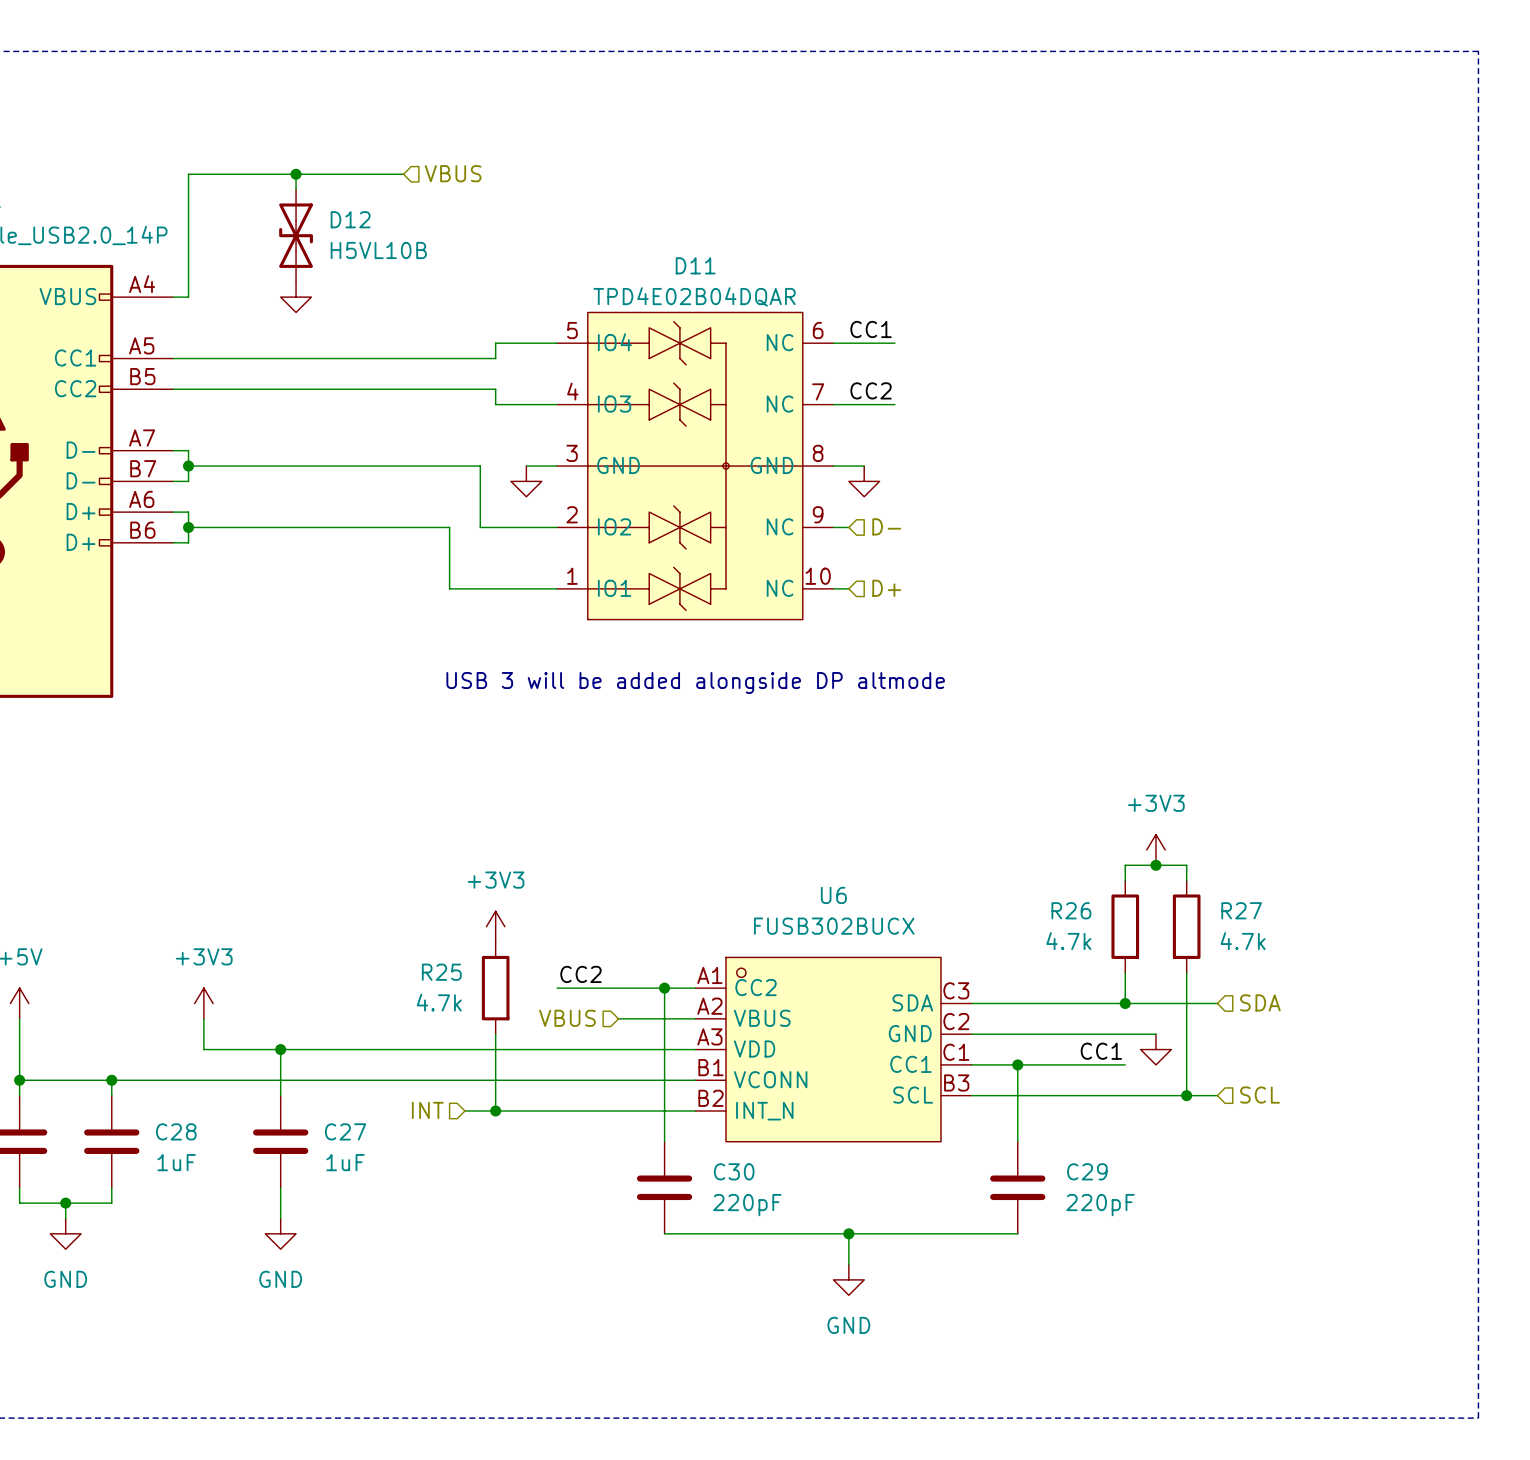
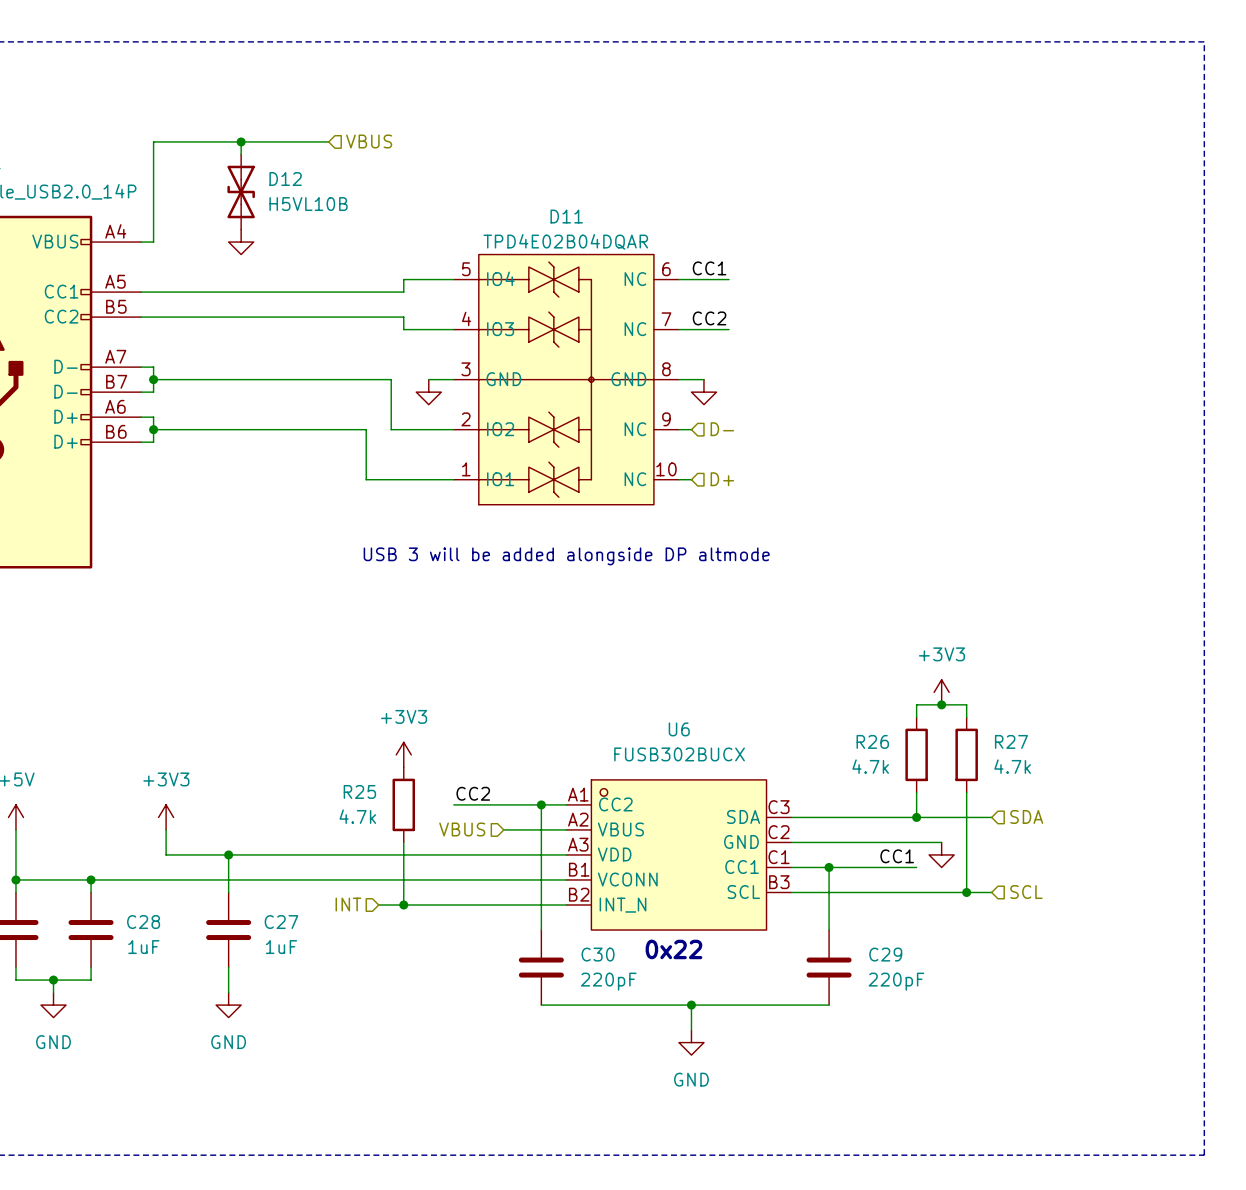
text: none -> 0x22 (673, 949)

